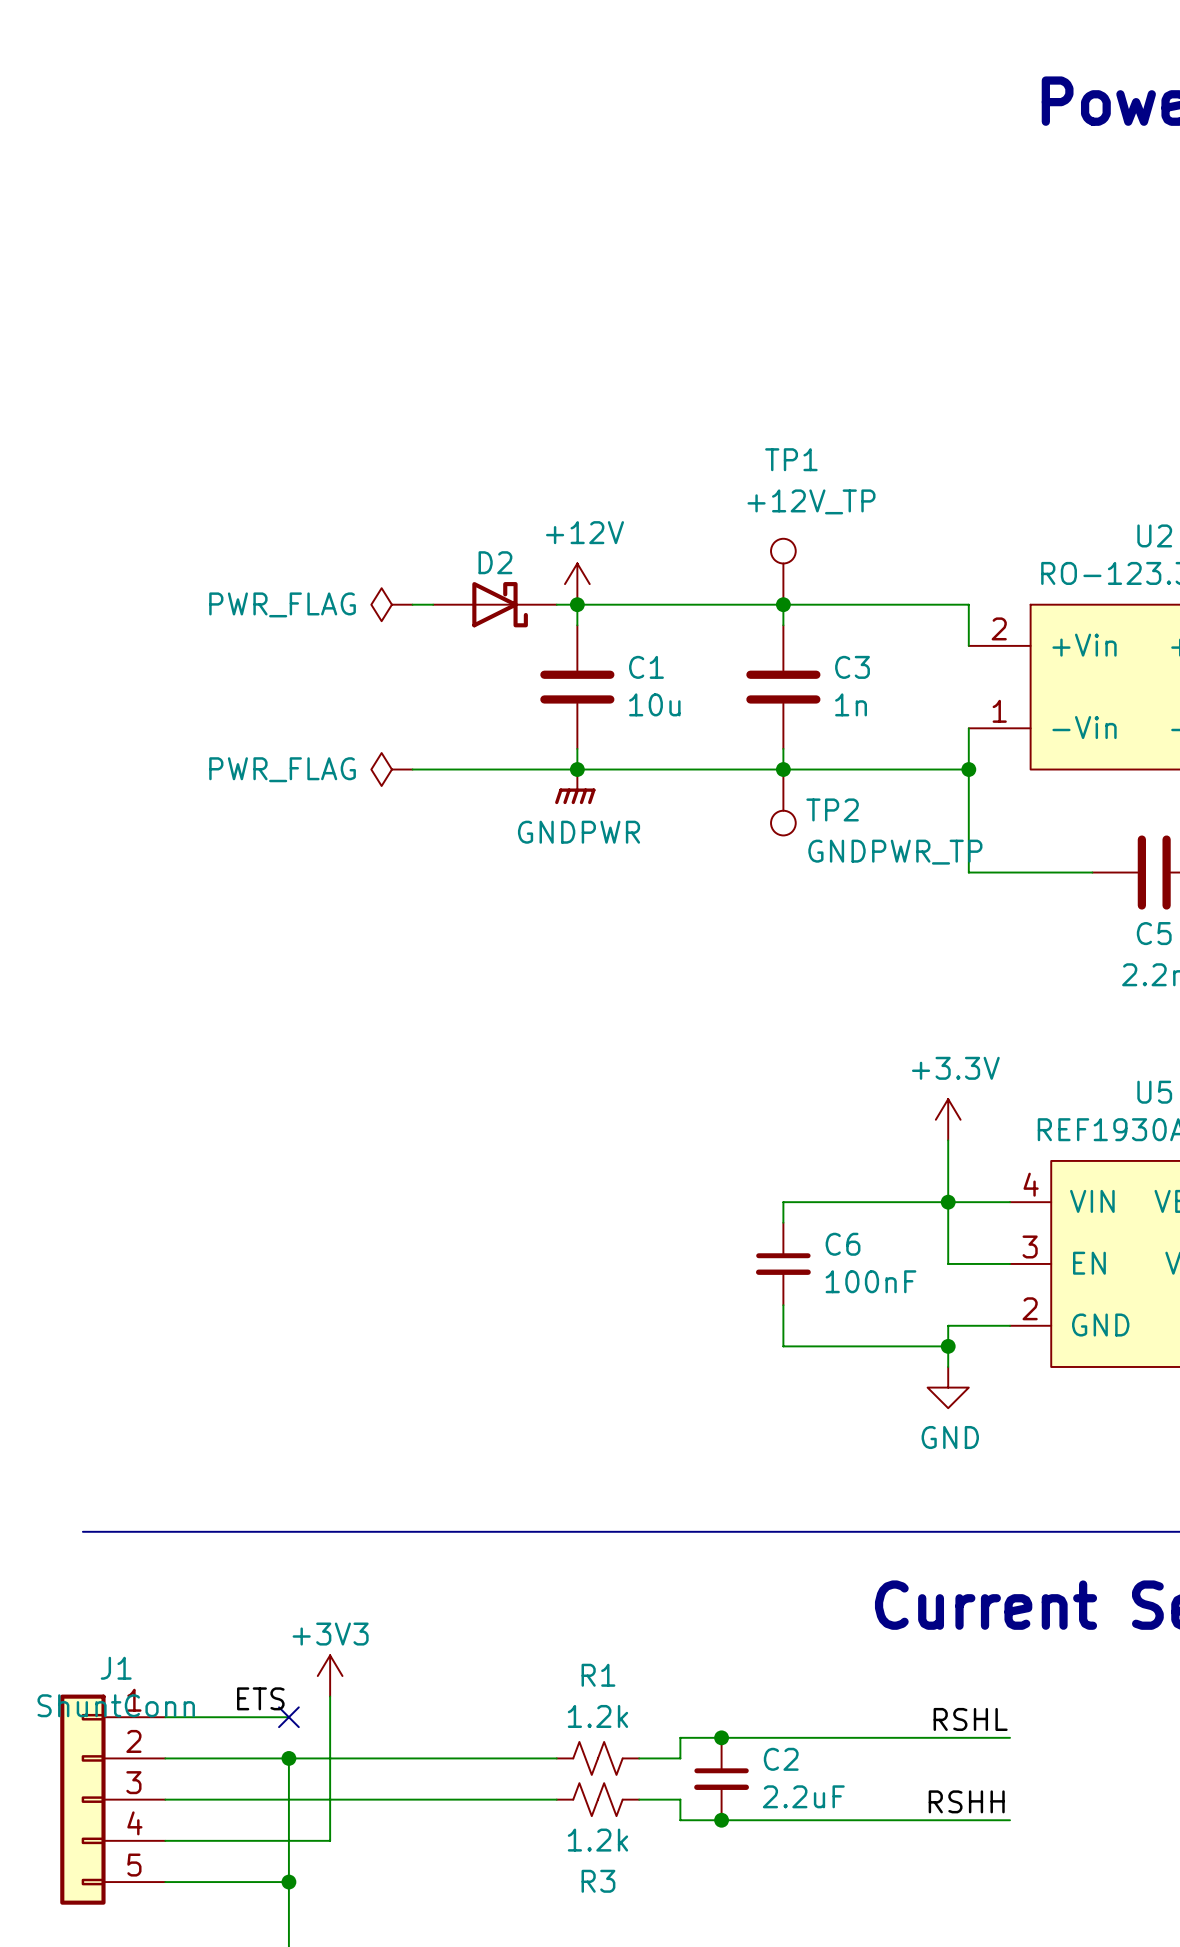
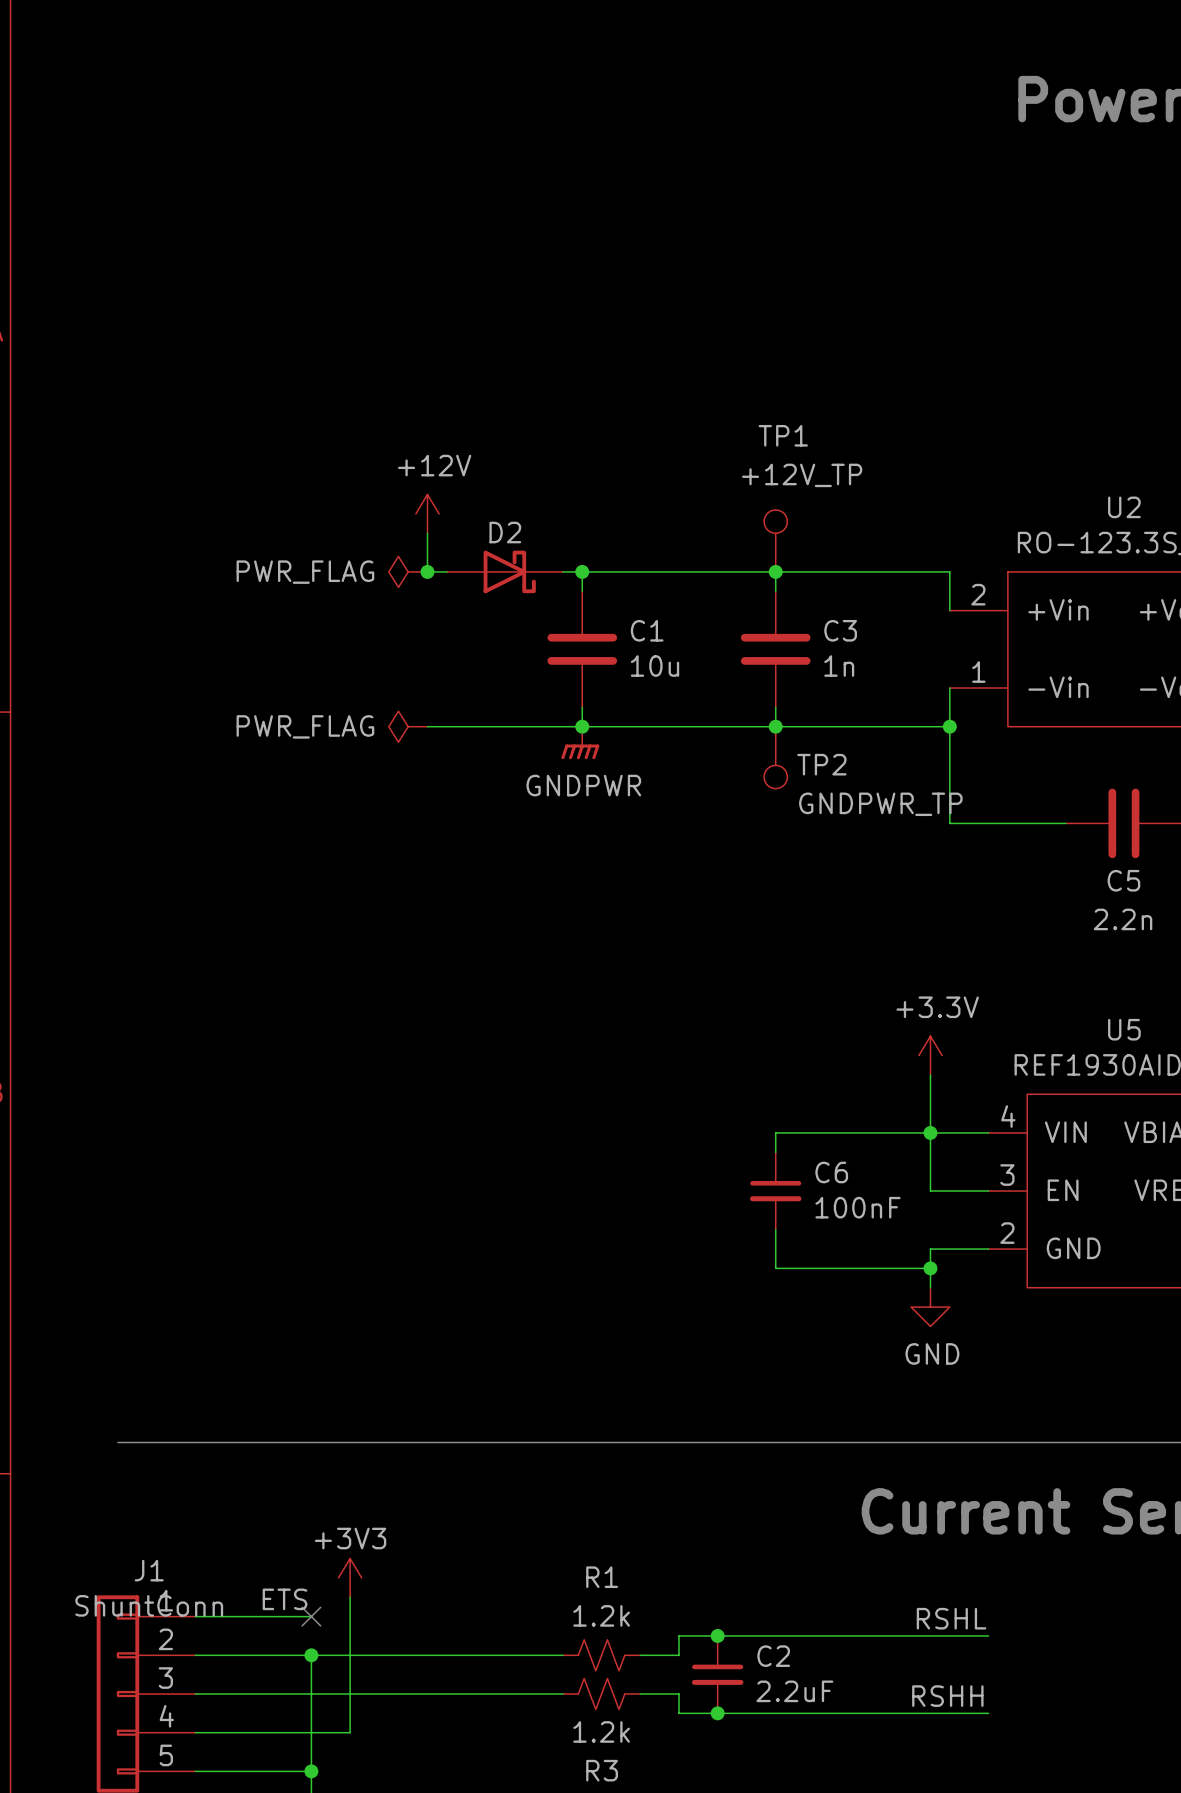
wire: none -> (427, 533) (427, 571)
power symbol position: +12V (577, 584) -> +12V (427, 513)
junction: none -> (427, 571)

